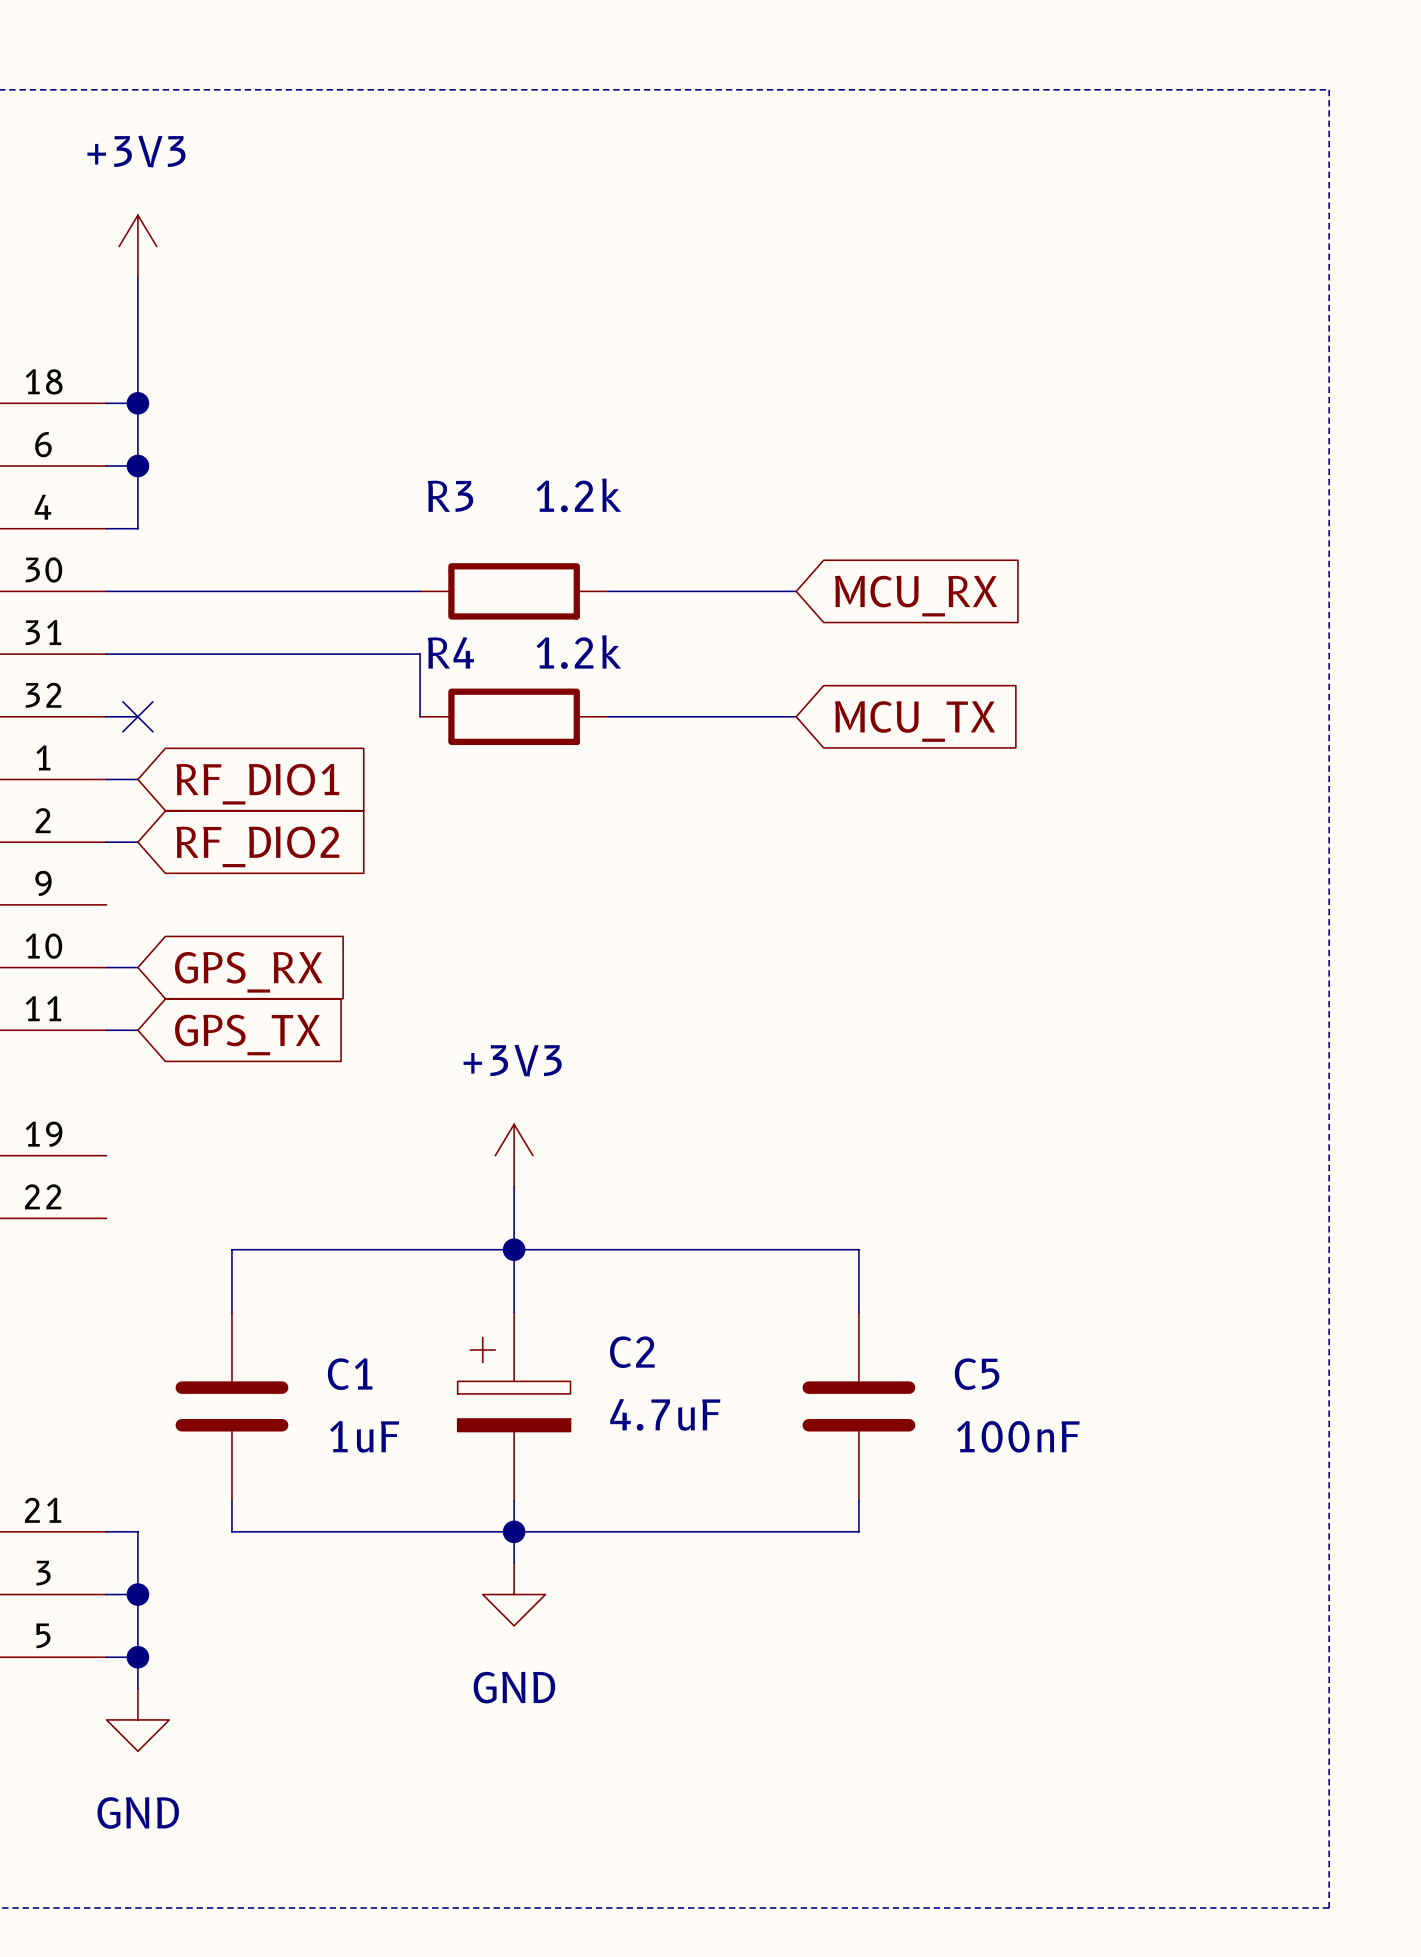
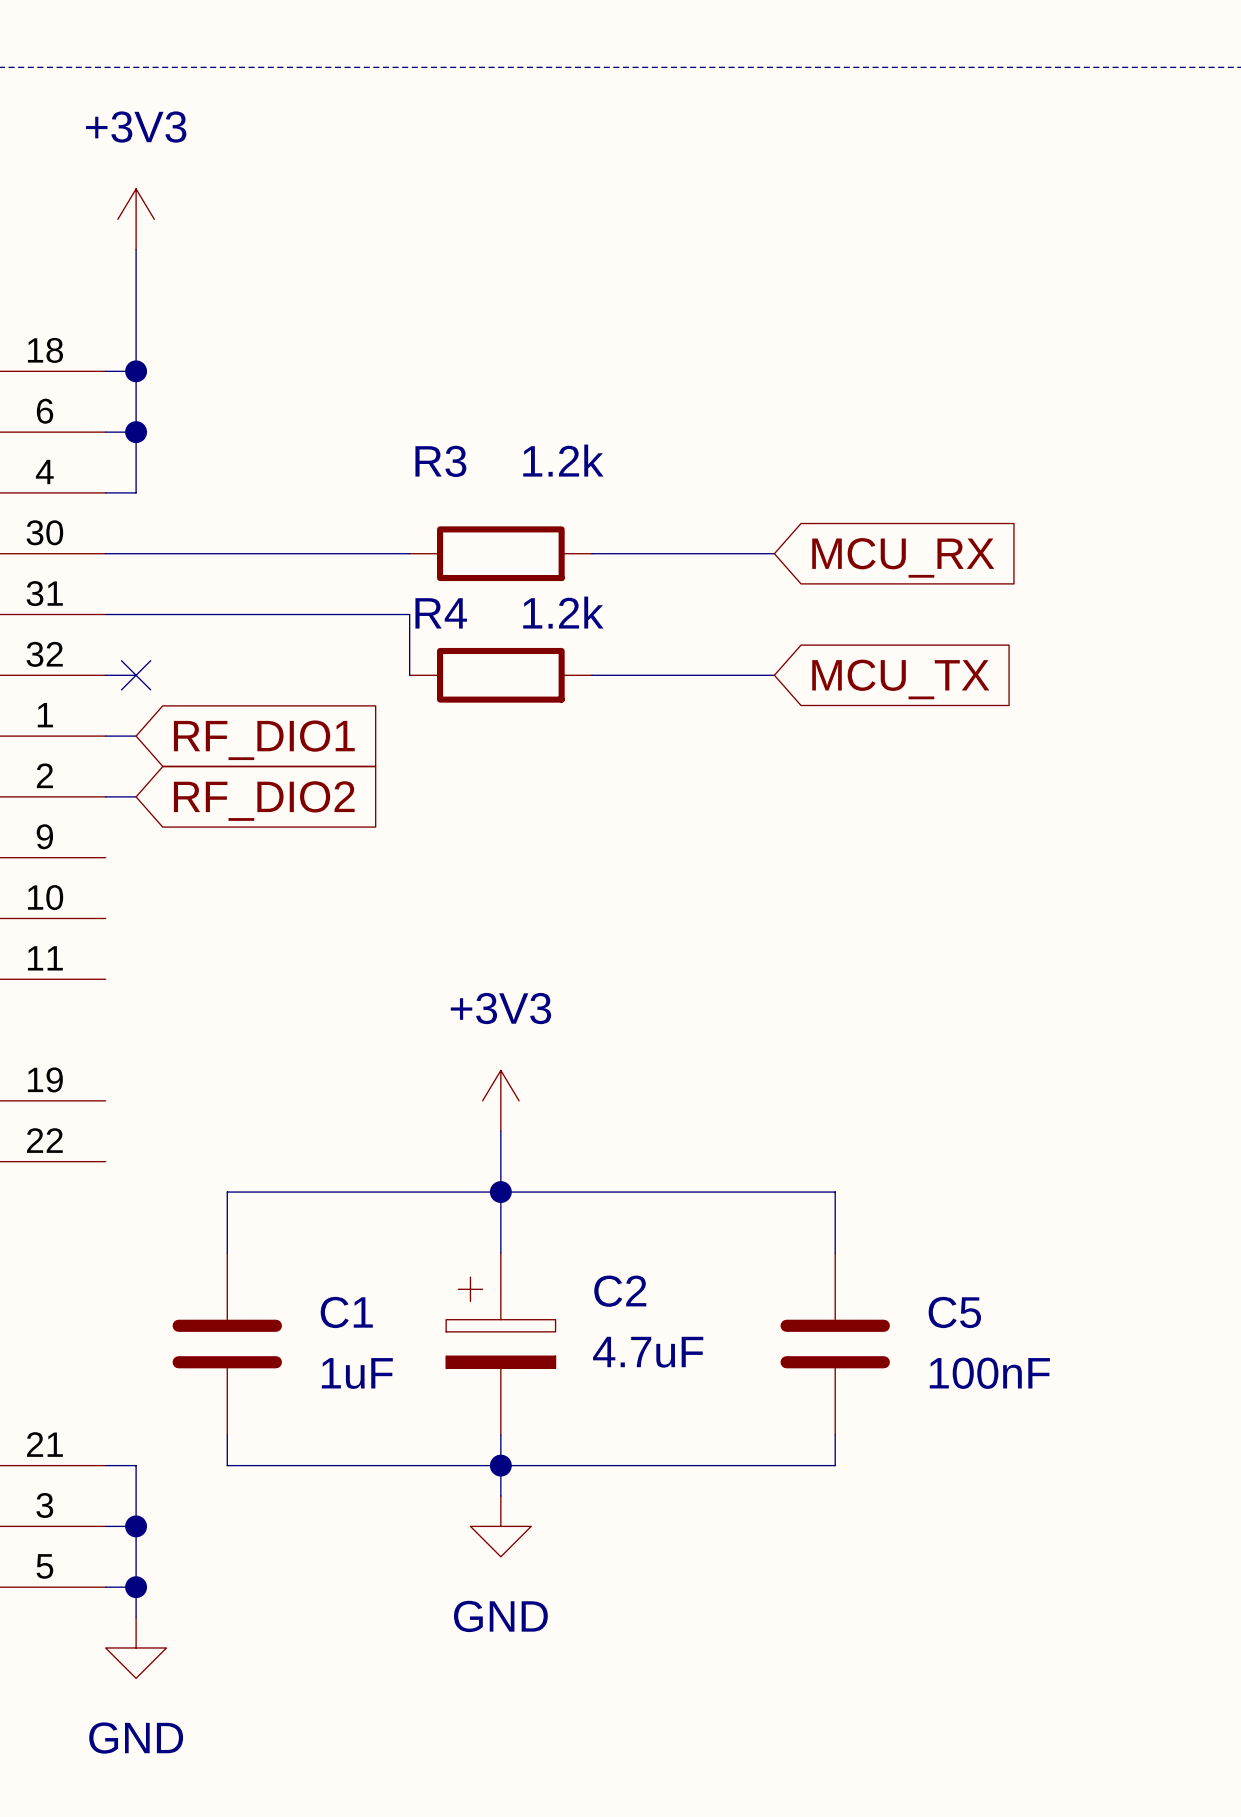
wire: (106, 967) (137, 967) -> none
global label: GPS_RX (248, 972) -> none
wire: (106, 1030) (137, 1030) -> none
global label: GPS_TX (247, 1034) -> none

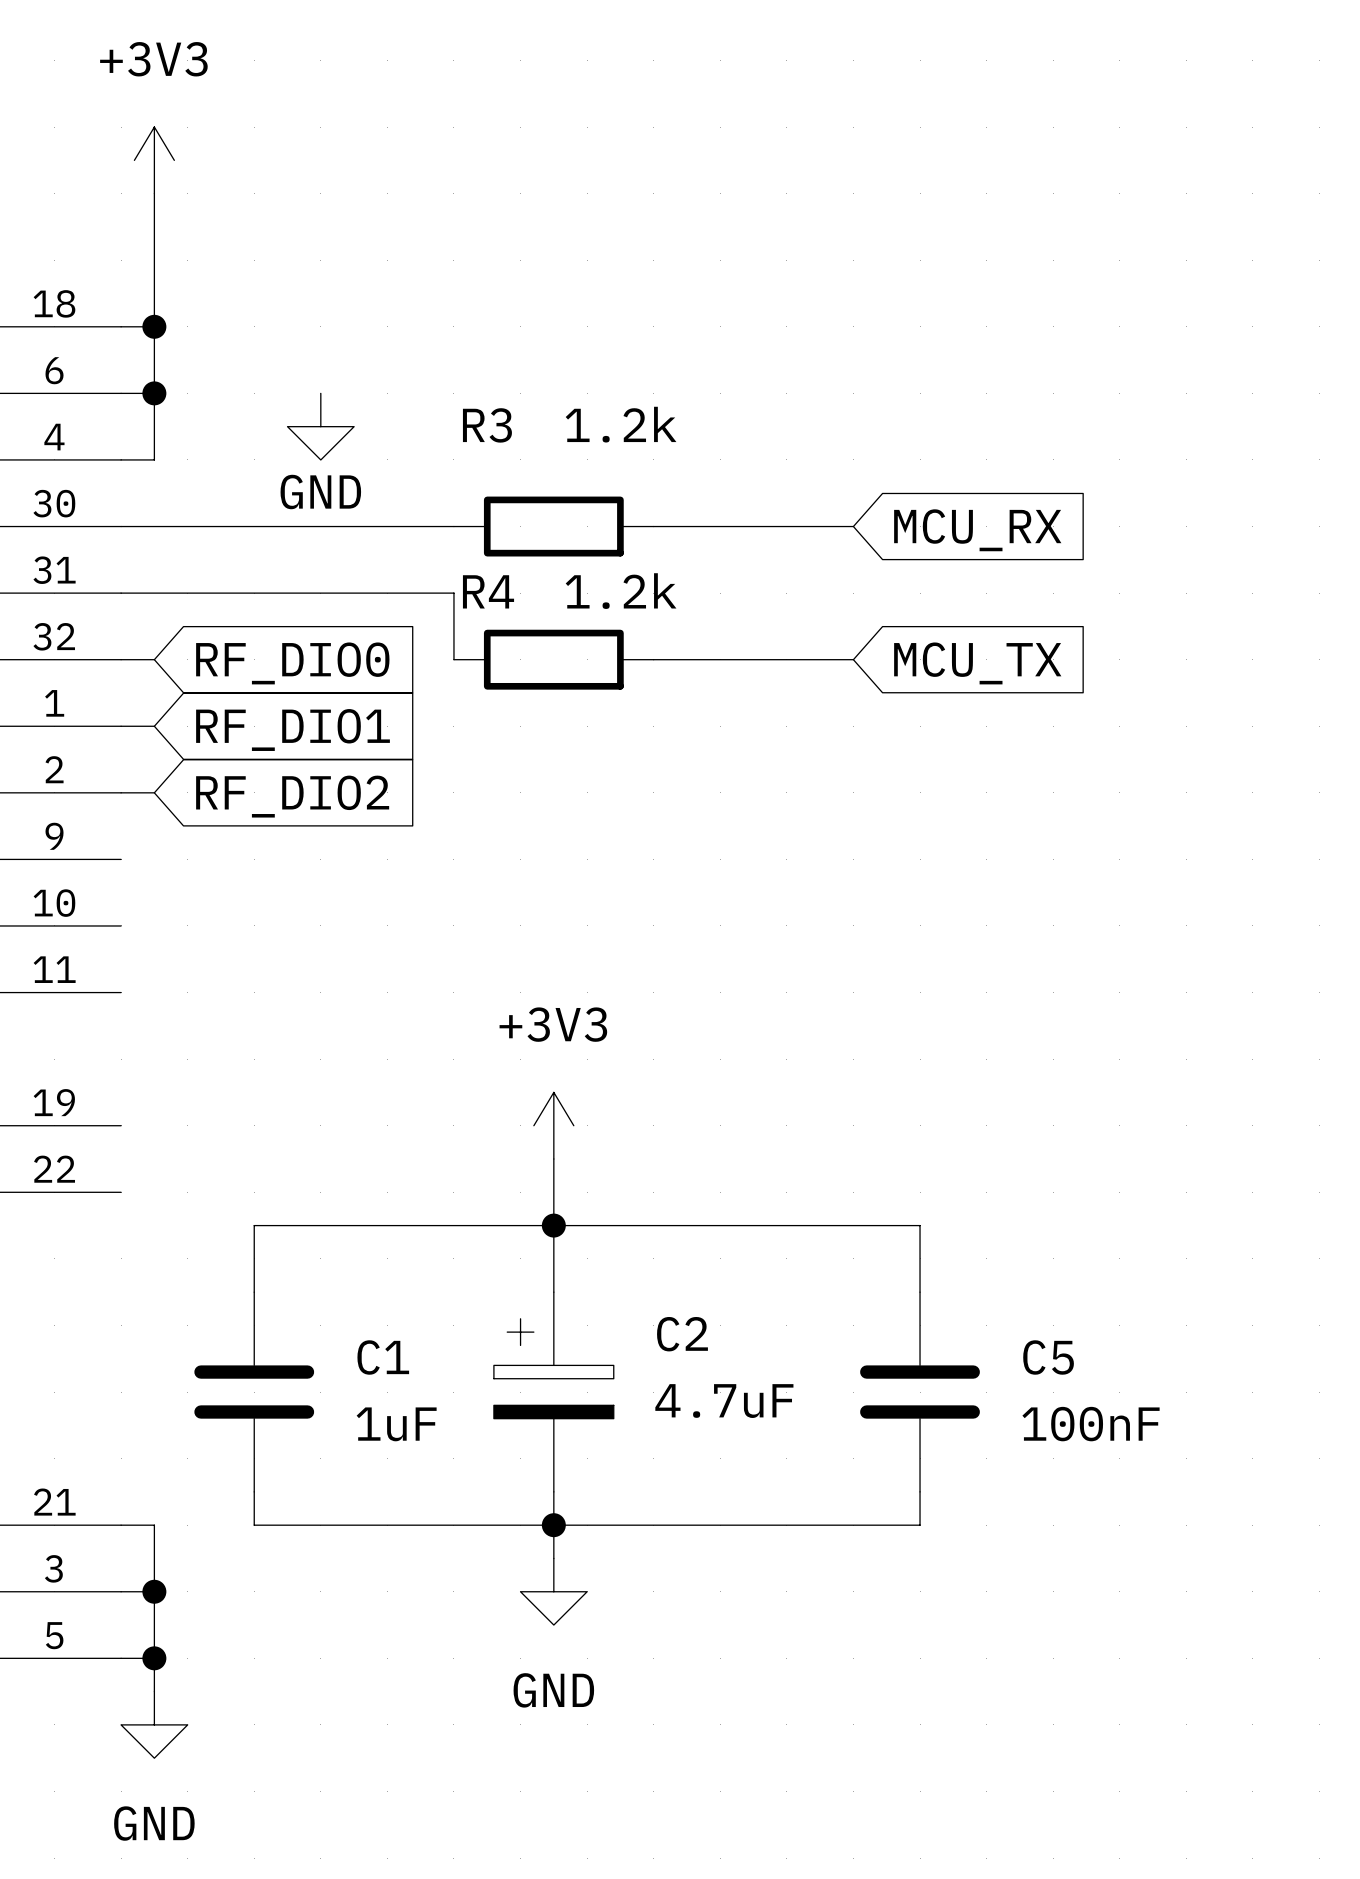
power symbol: none -> GND (320, 426)
no-connect mark: (136, 675) -> none
global label: none -> RF_DIO0 (292, 663)

